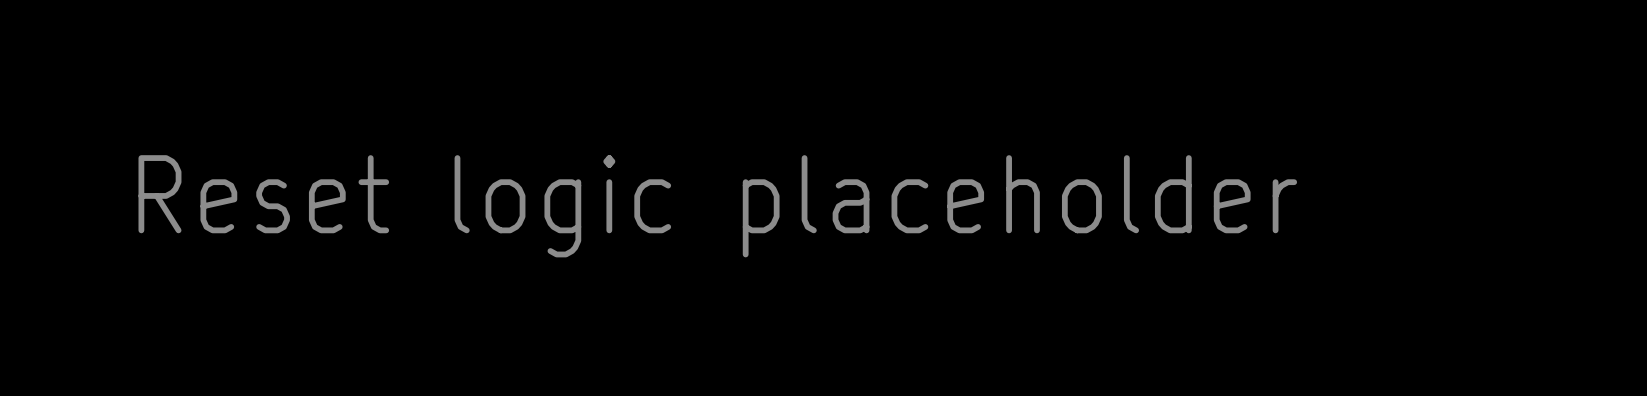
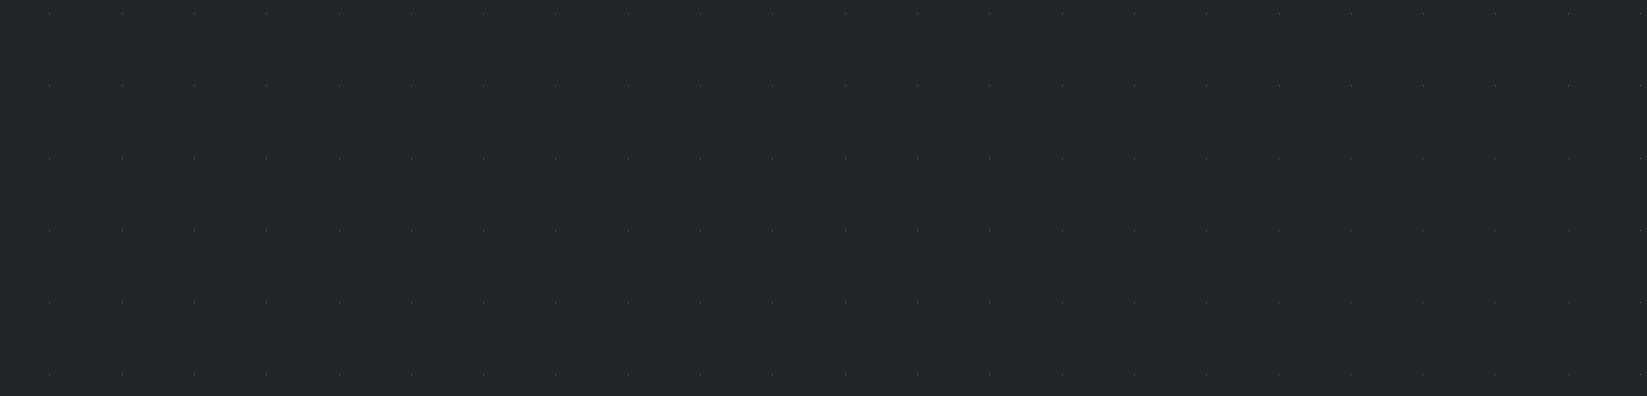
text: Reset logic placeholder (717, 206) -> none

